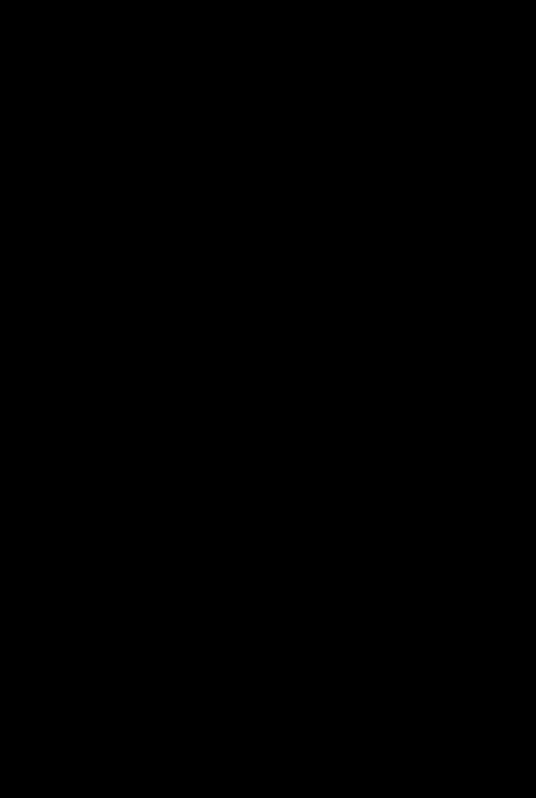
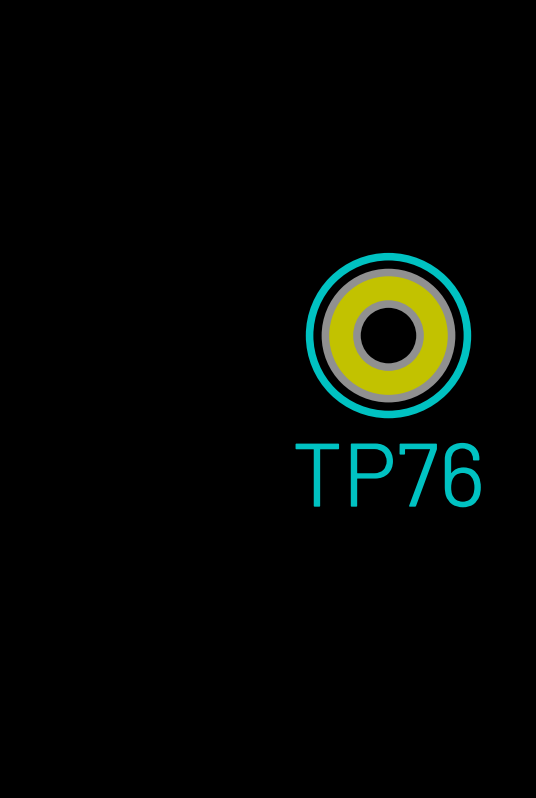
TP76: none -> (388, 335)

